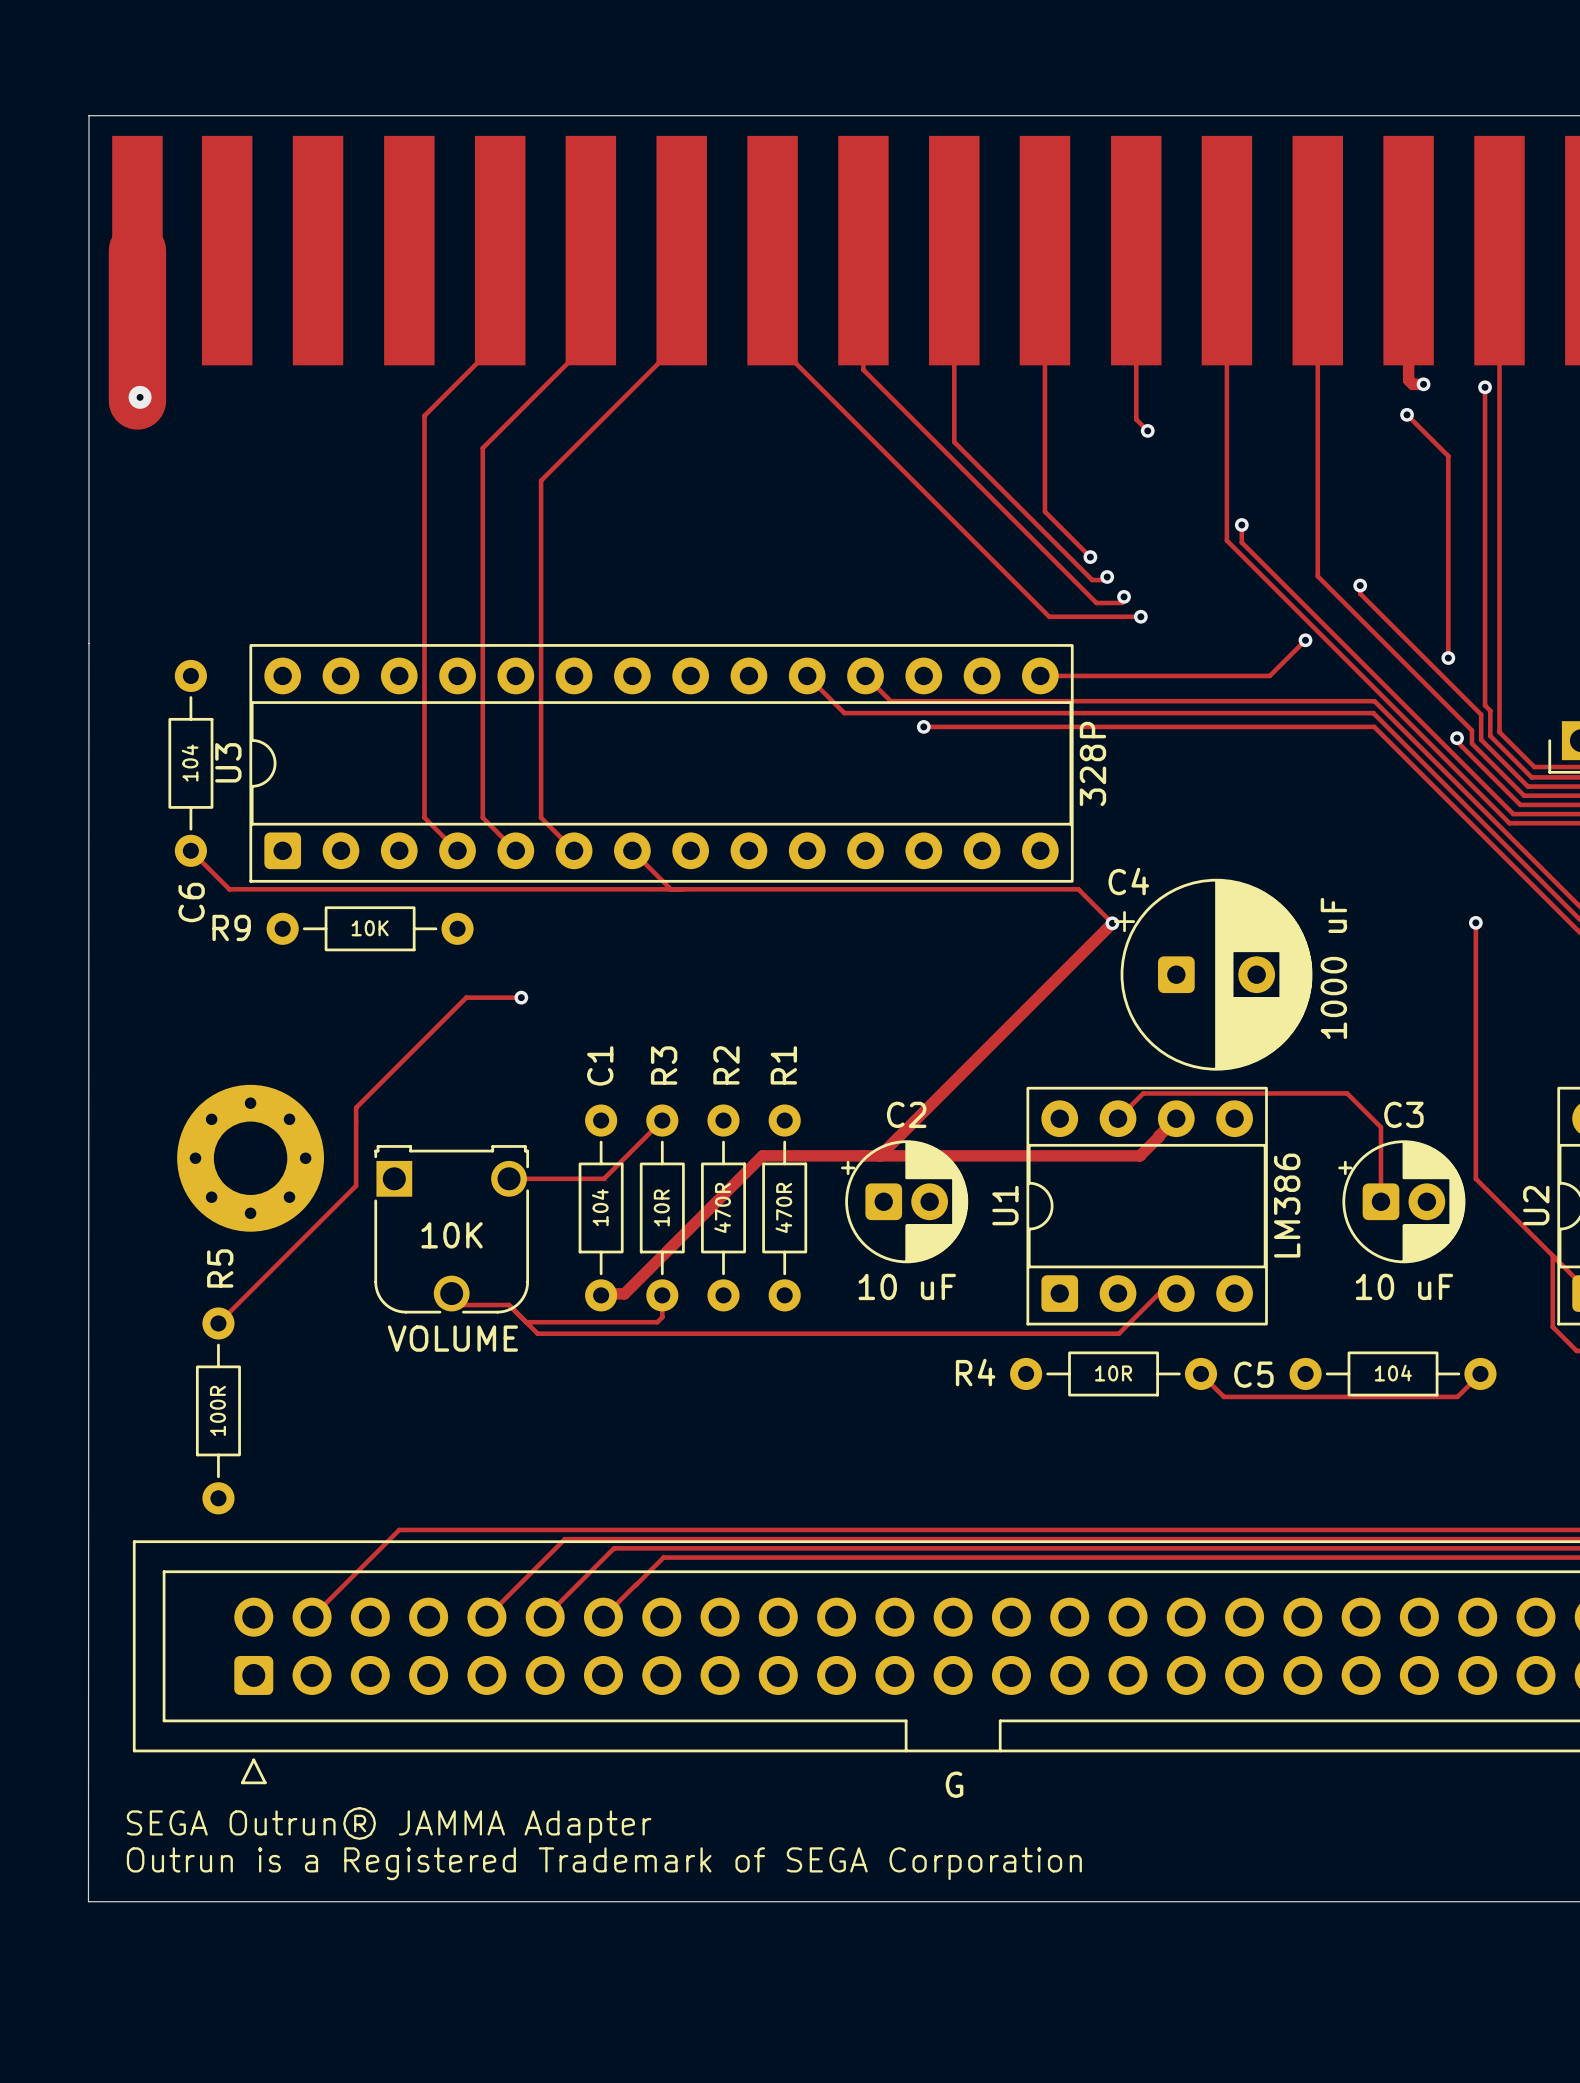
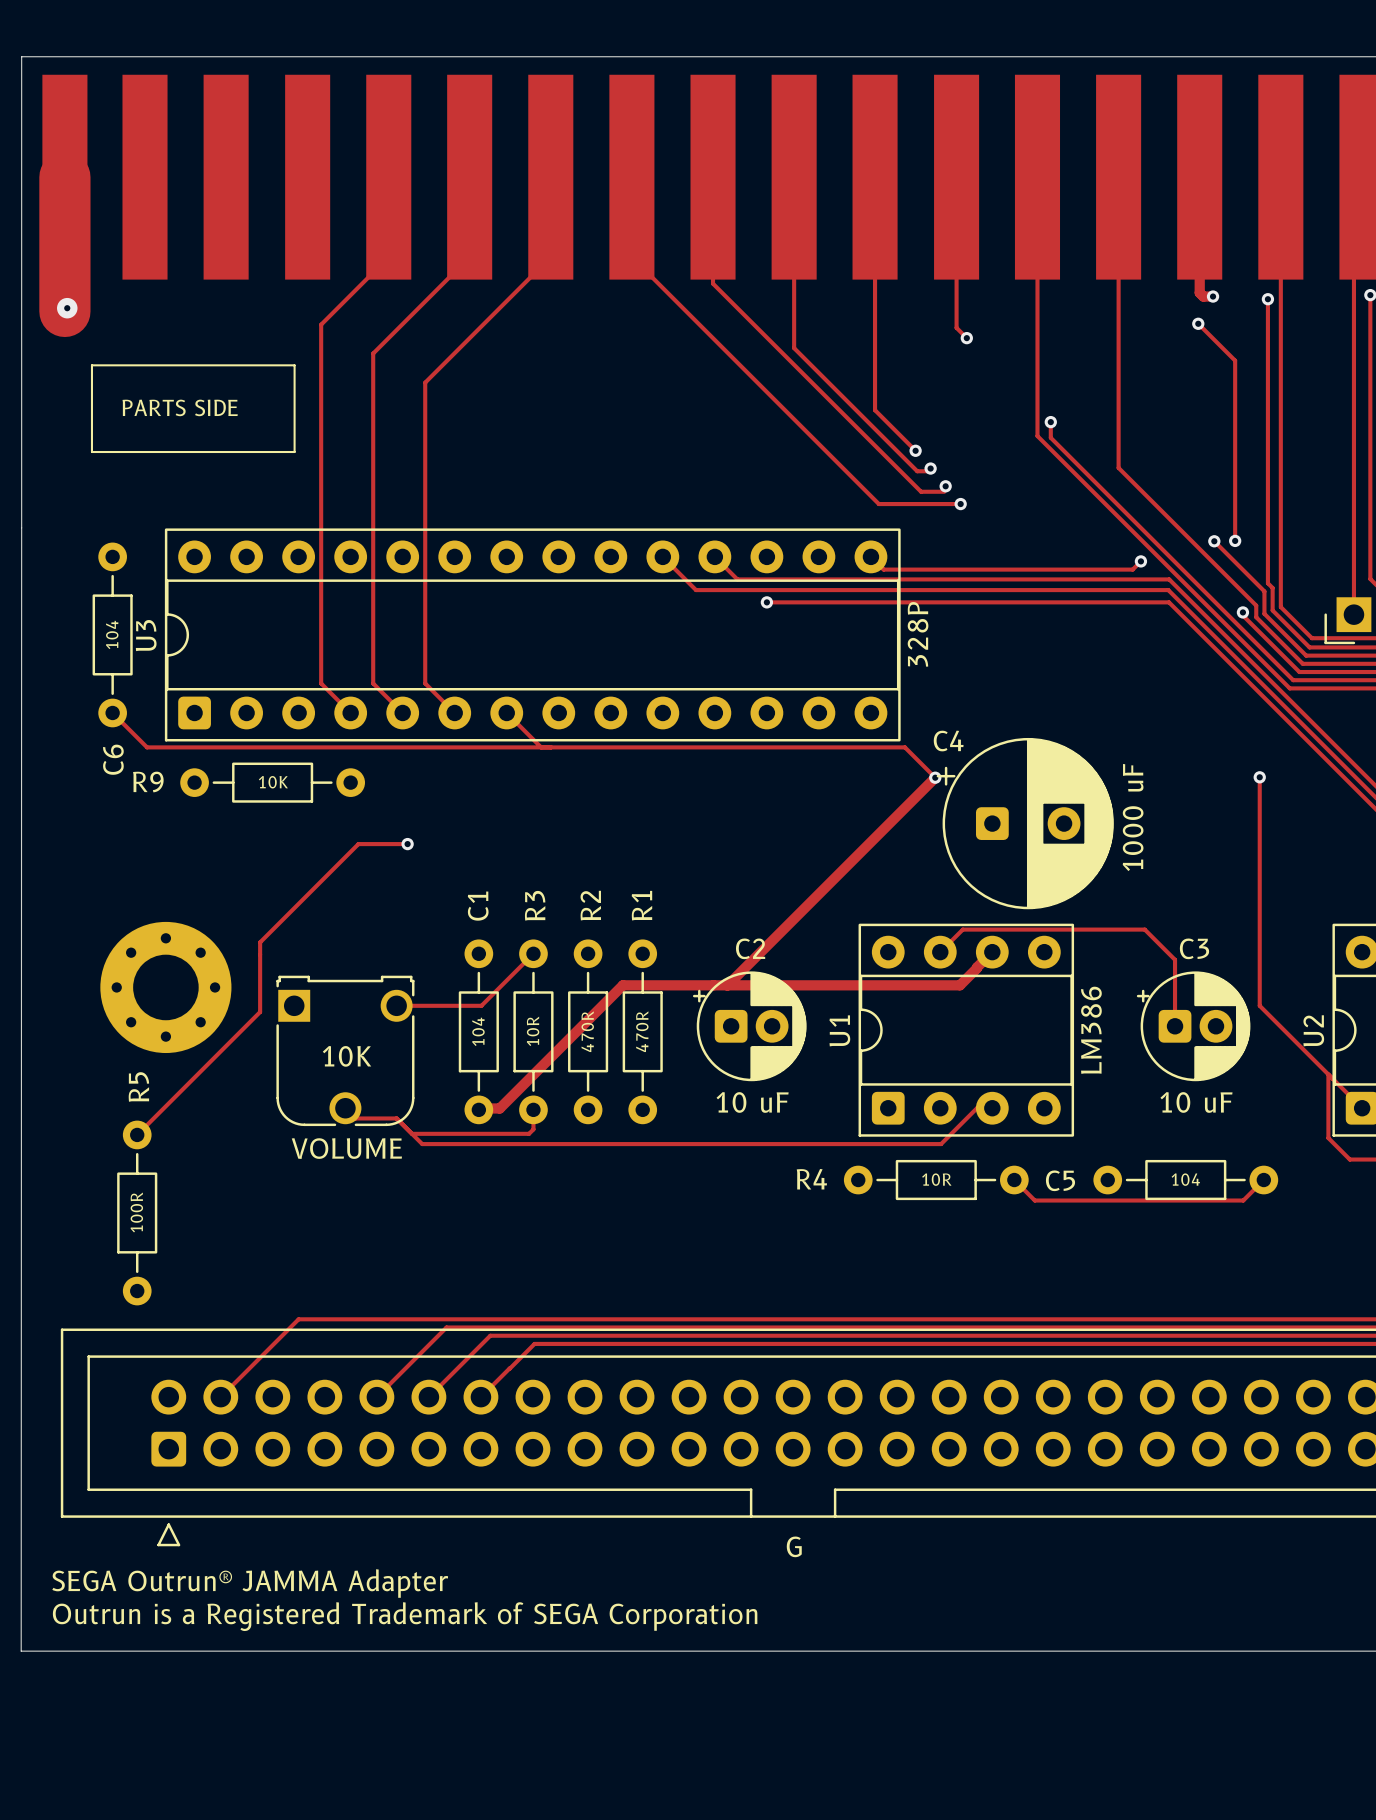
line: none -> (91, 365) (294, 365) (294, 452) (91, 452) (91, 365)
text: none -> PARTS SIDE (180, 407)
track: (1360, 585) (1360, 593) (1424, 658) -> none
via: (1360, 585) -> none
track: (1305, 640) (1269, 675) (1040, 675) -> (1140, 561) (1132, 569) (883, 569) (870, 556)
via: (1305, 640) -> none
via: none -> (1214, 541)
via: none -> (1140, 561)

